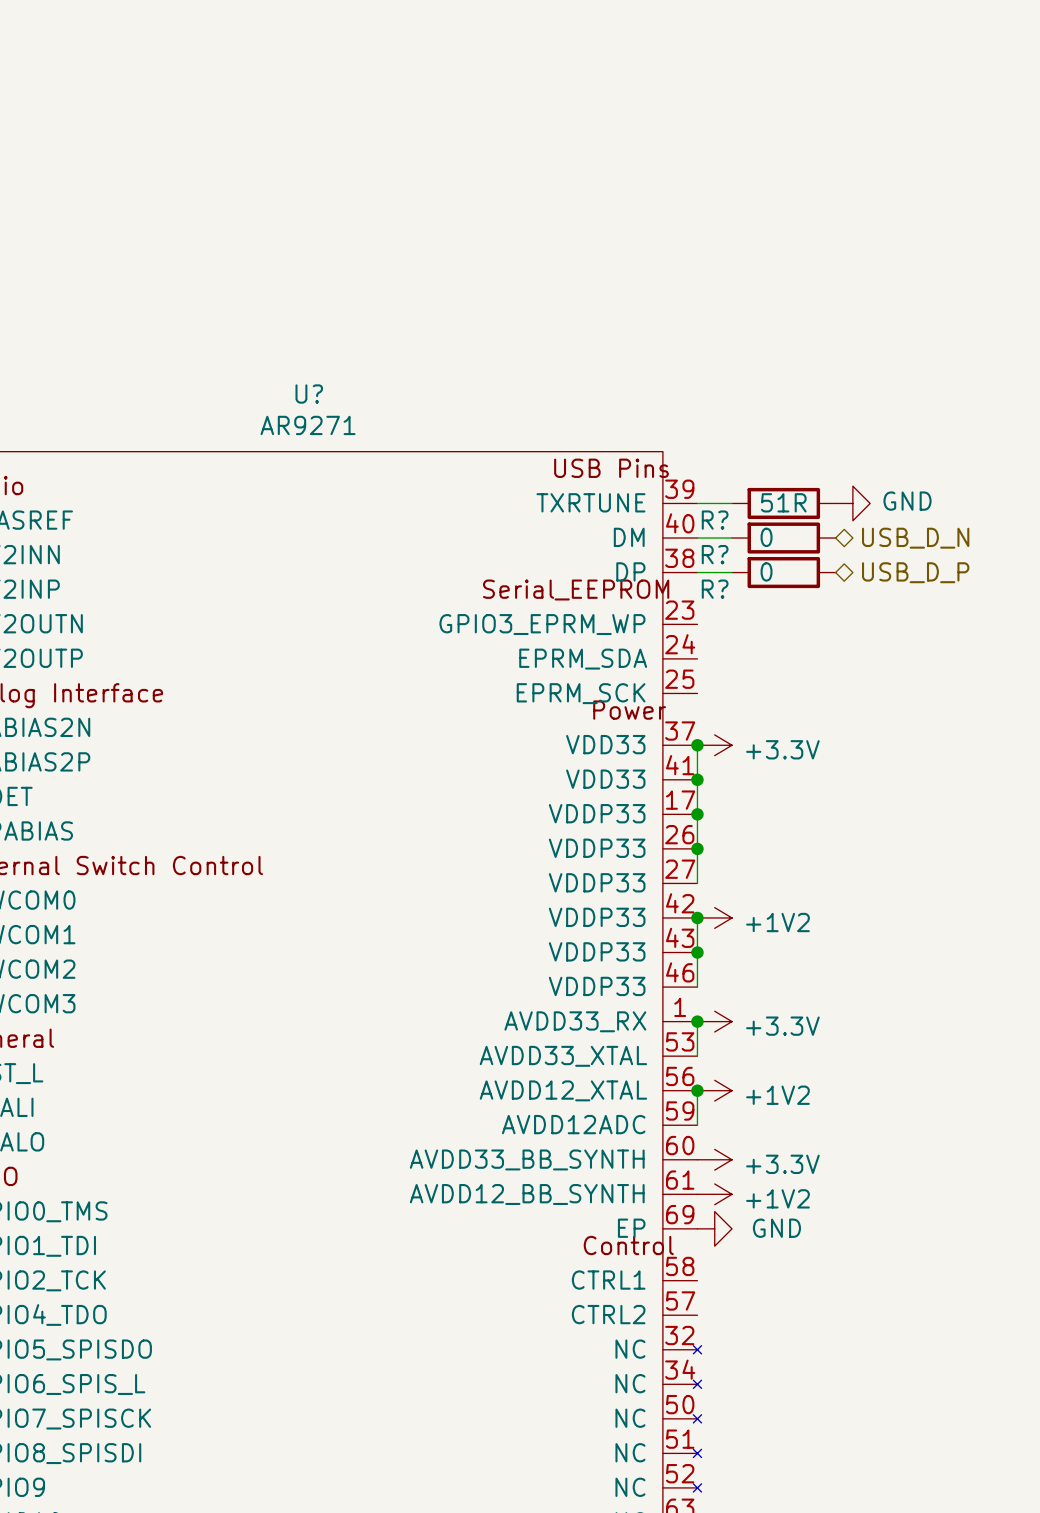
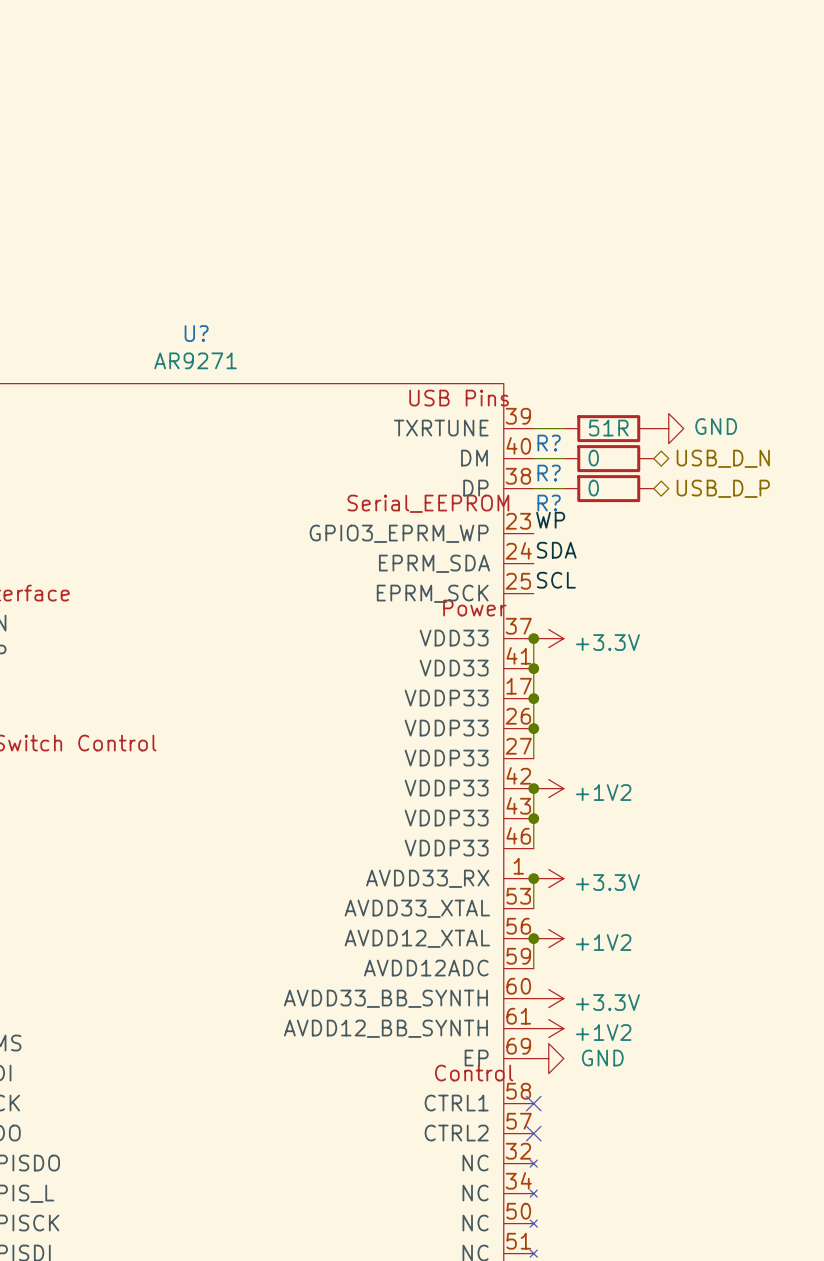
label: none -> WP (550, 520)
label: none -> SDA (556, 550)
label: none -> SCL (556, 580)
no-connect mark: none -> (533, 1103)
no-connect mark: none -> (533, 1133)

